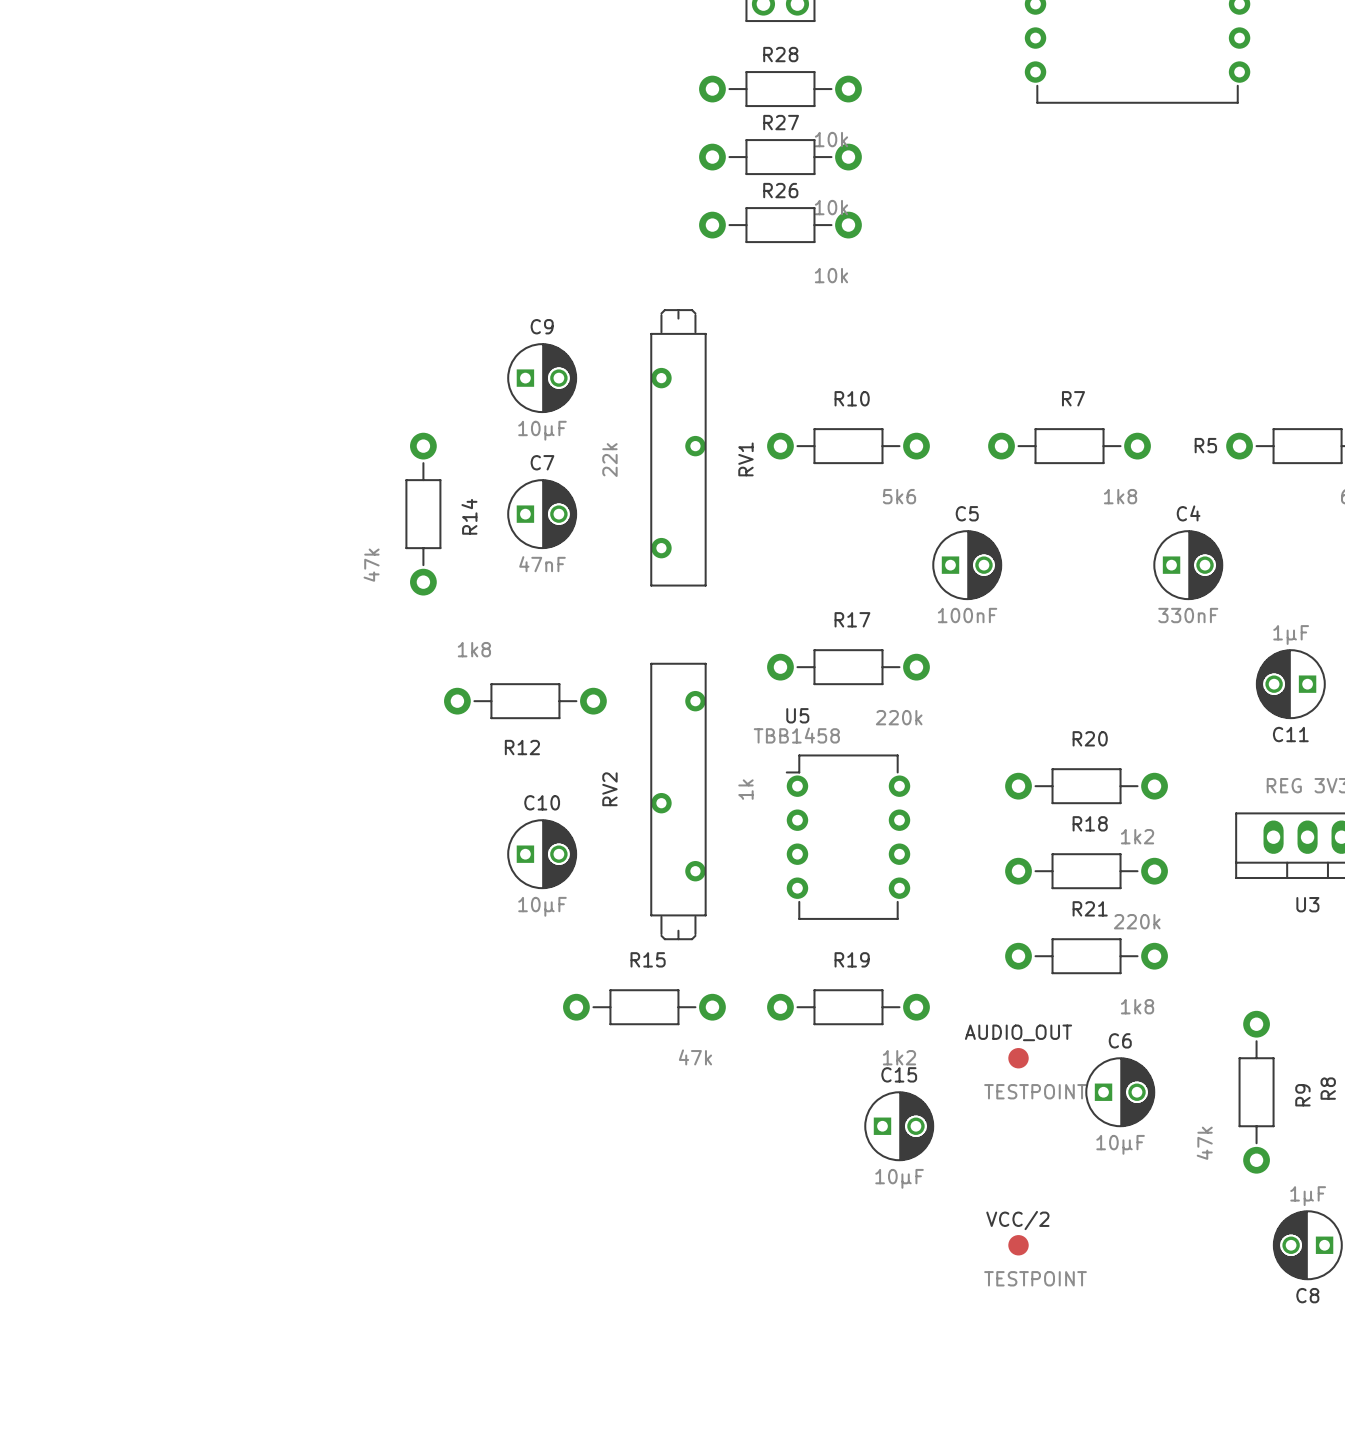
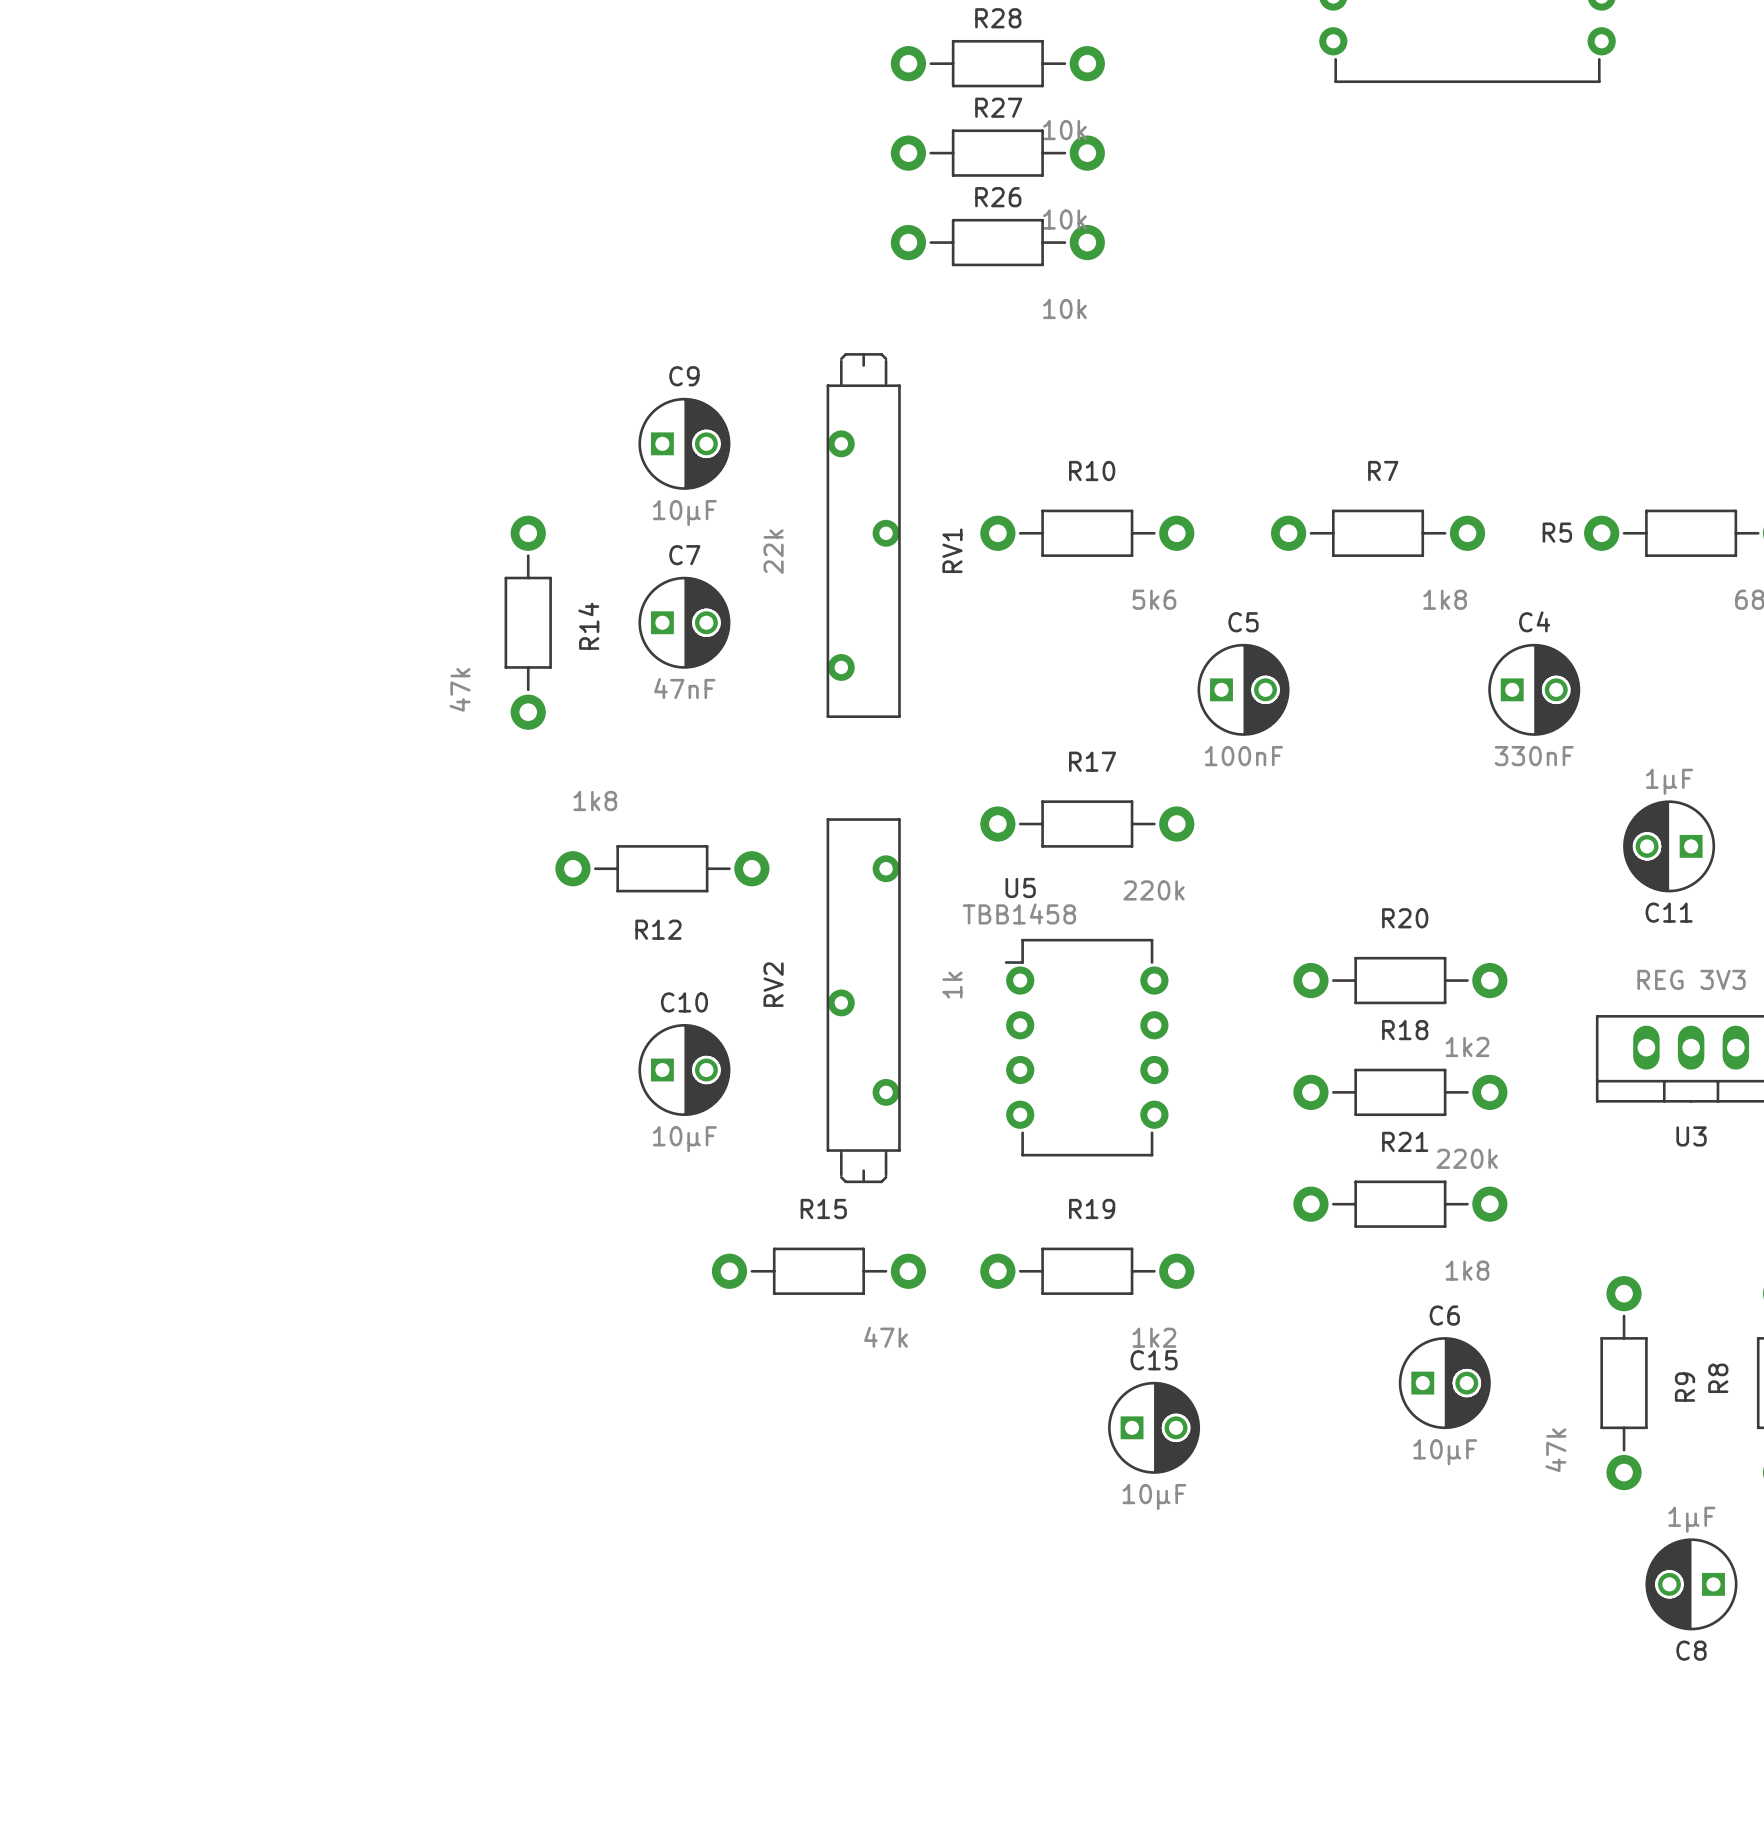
text: AUDIO_OUT (1018, 1032) -> none
part: TESTPOINT (1018, 1058) -> none
text: VCC/2 (1017, 1220) -> none
part: TESTPOINT (1018, 1245) -> none

